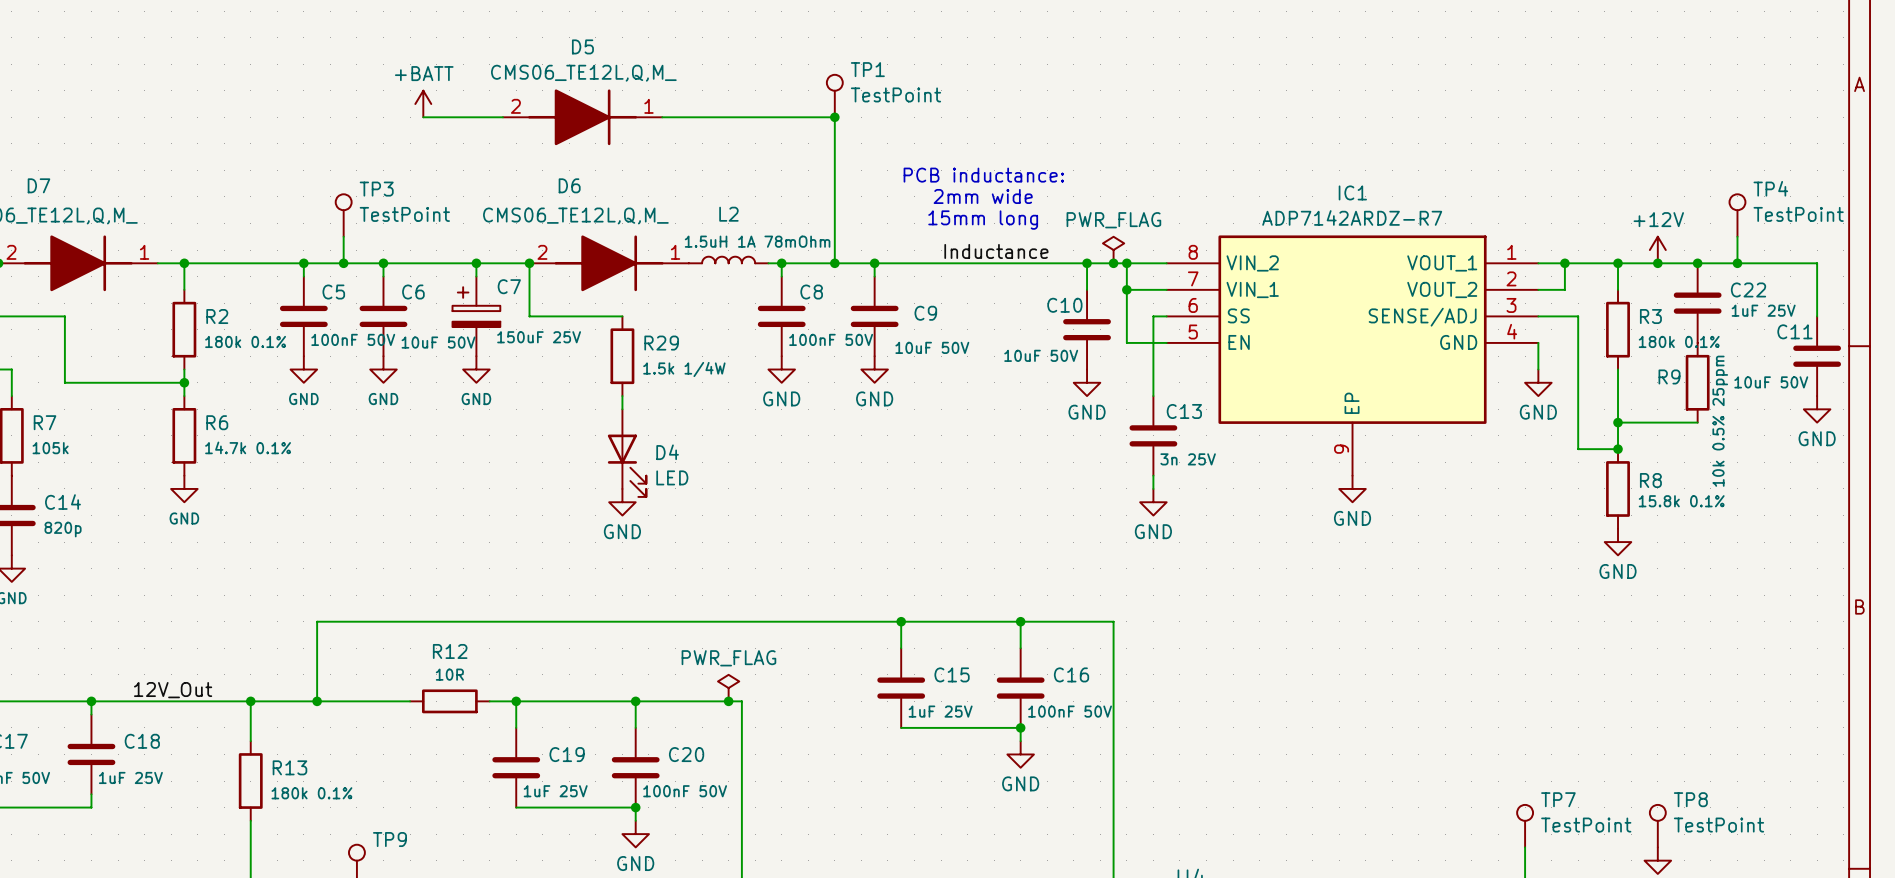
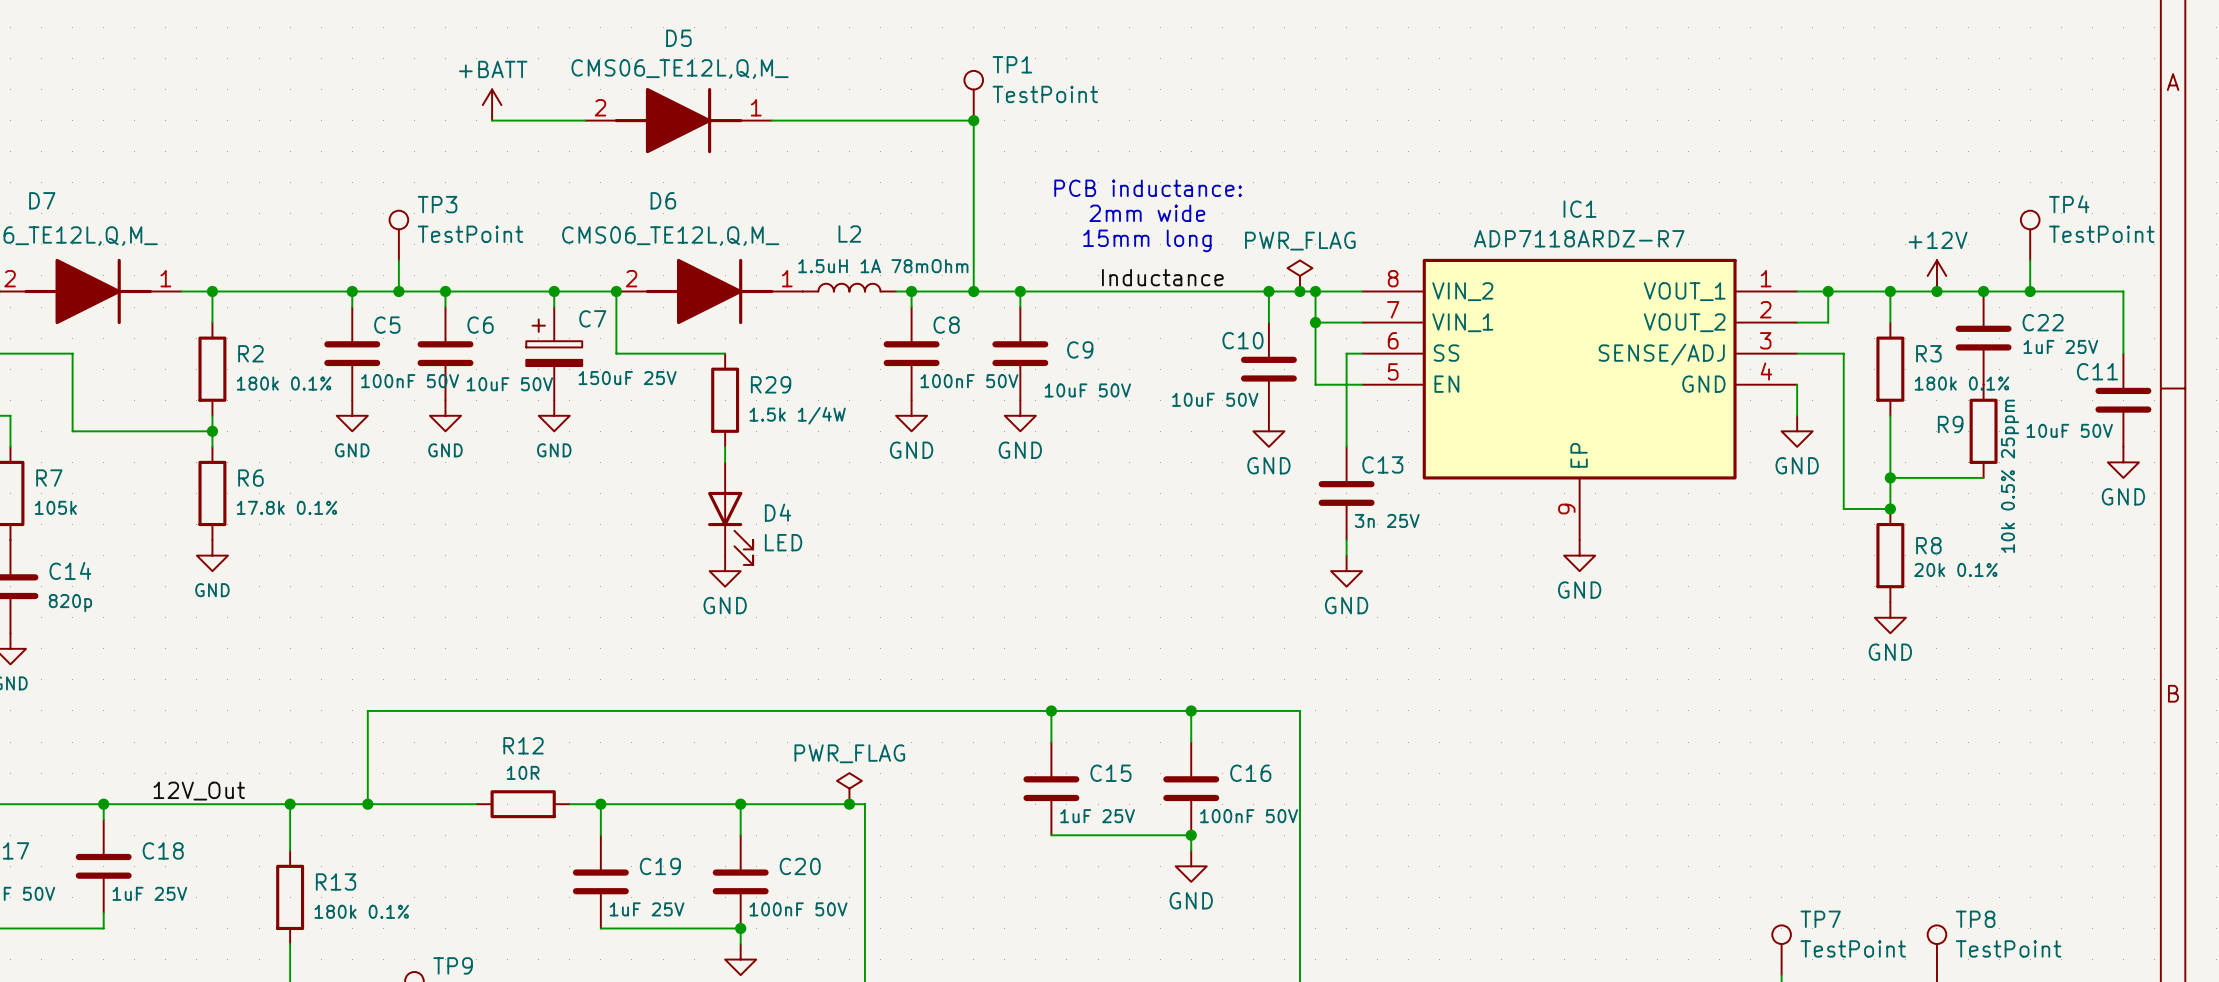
IC1 value: ADP7142ARDZ-R7 (1352, 217) -> ADP7118ARDZ-R7 (1579, 238)
R6 value: 14.7k 0.1% (248, 447) -> 17.8k 0.1% (286, 507)
R8 value: 15.8k 0.1% (1681, 501) -> 20k 0.1% (1955, 569)

